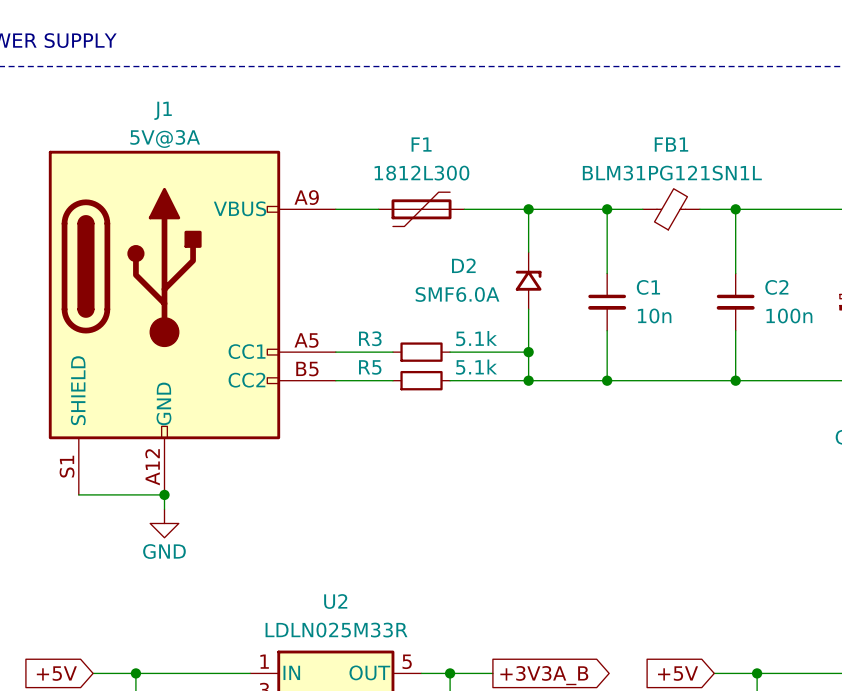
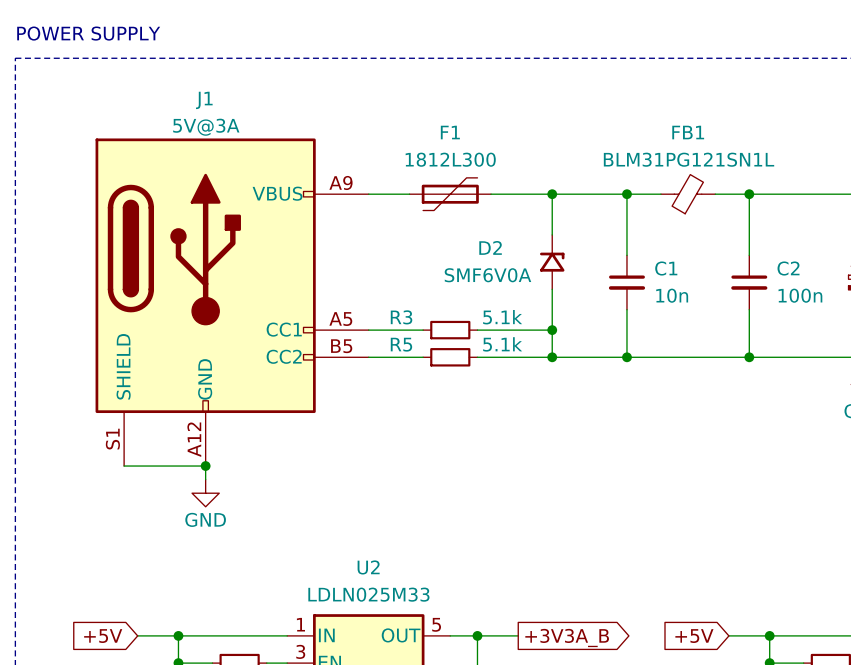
D2 value: SMF6.0A (457, 294) -> SMF6V0A (487, 275)
U2 value: LDLN025M33R (336, 630) -> LDLN025M33 (368, 594)

